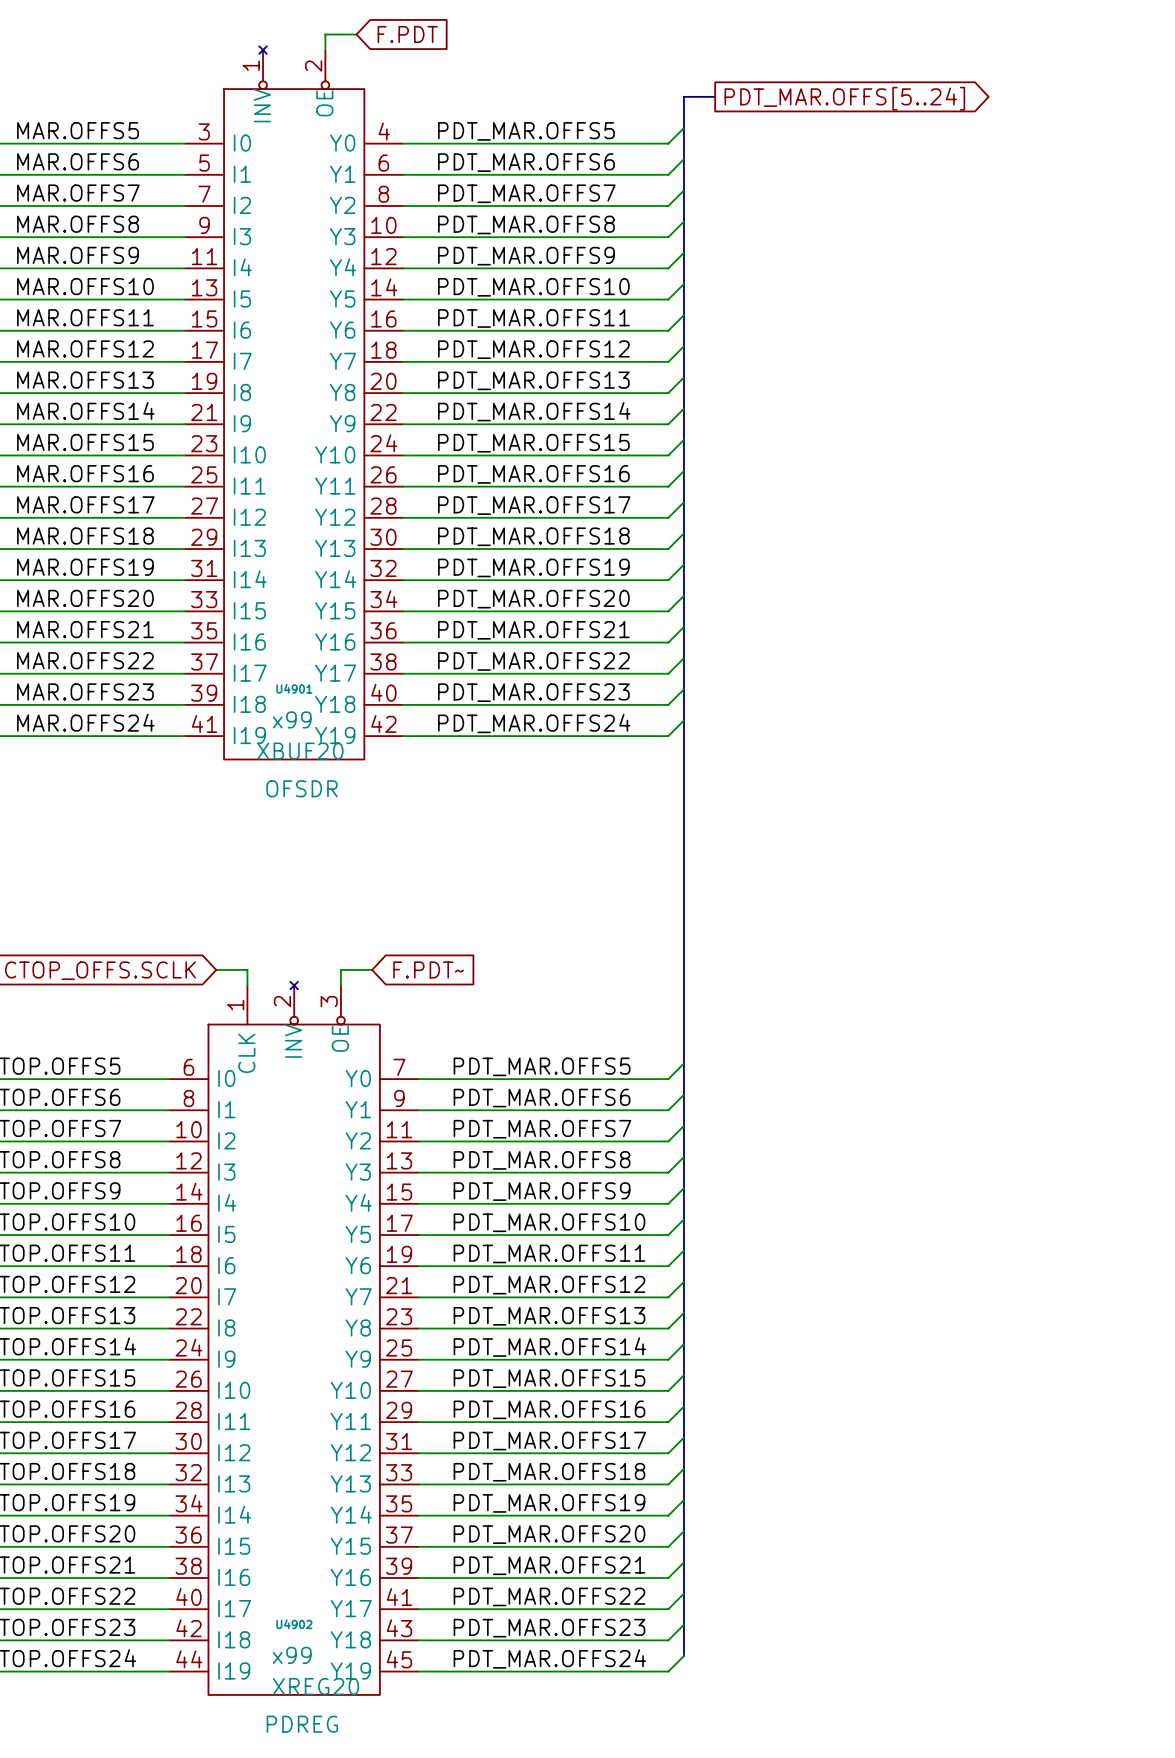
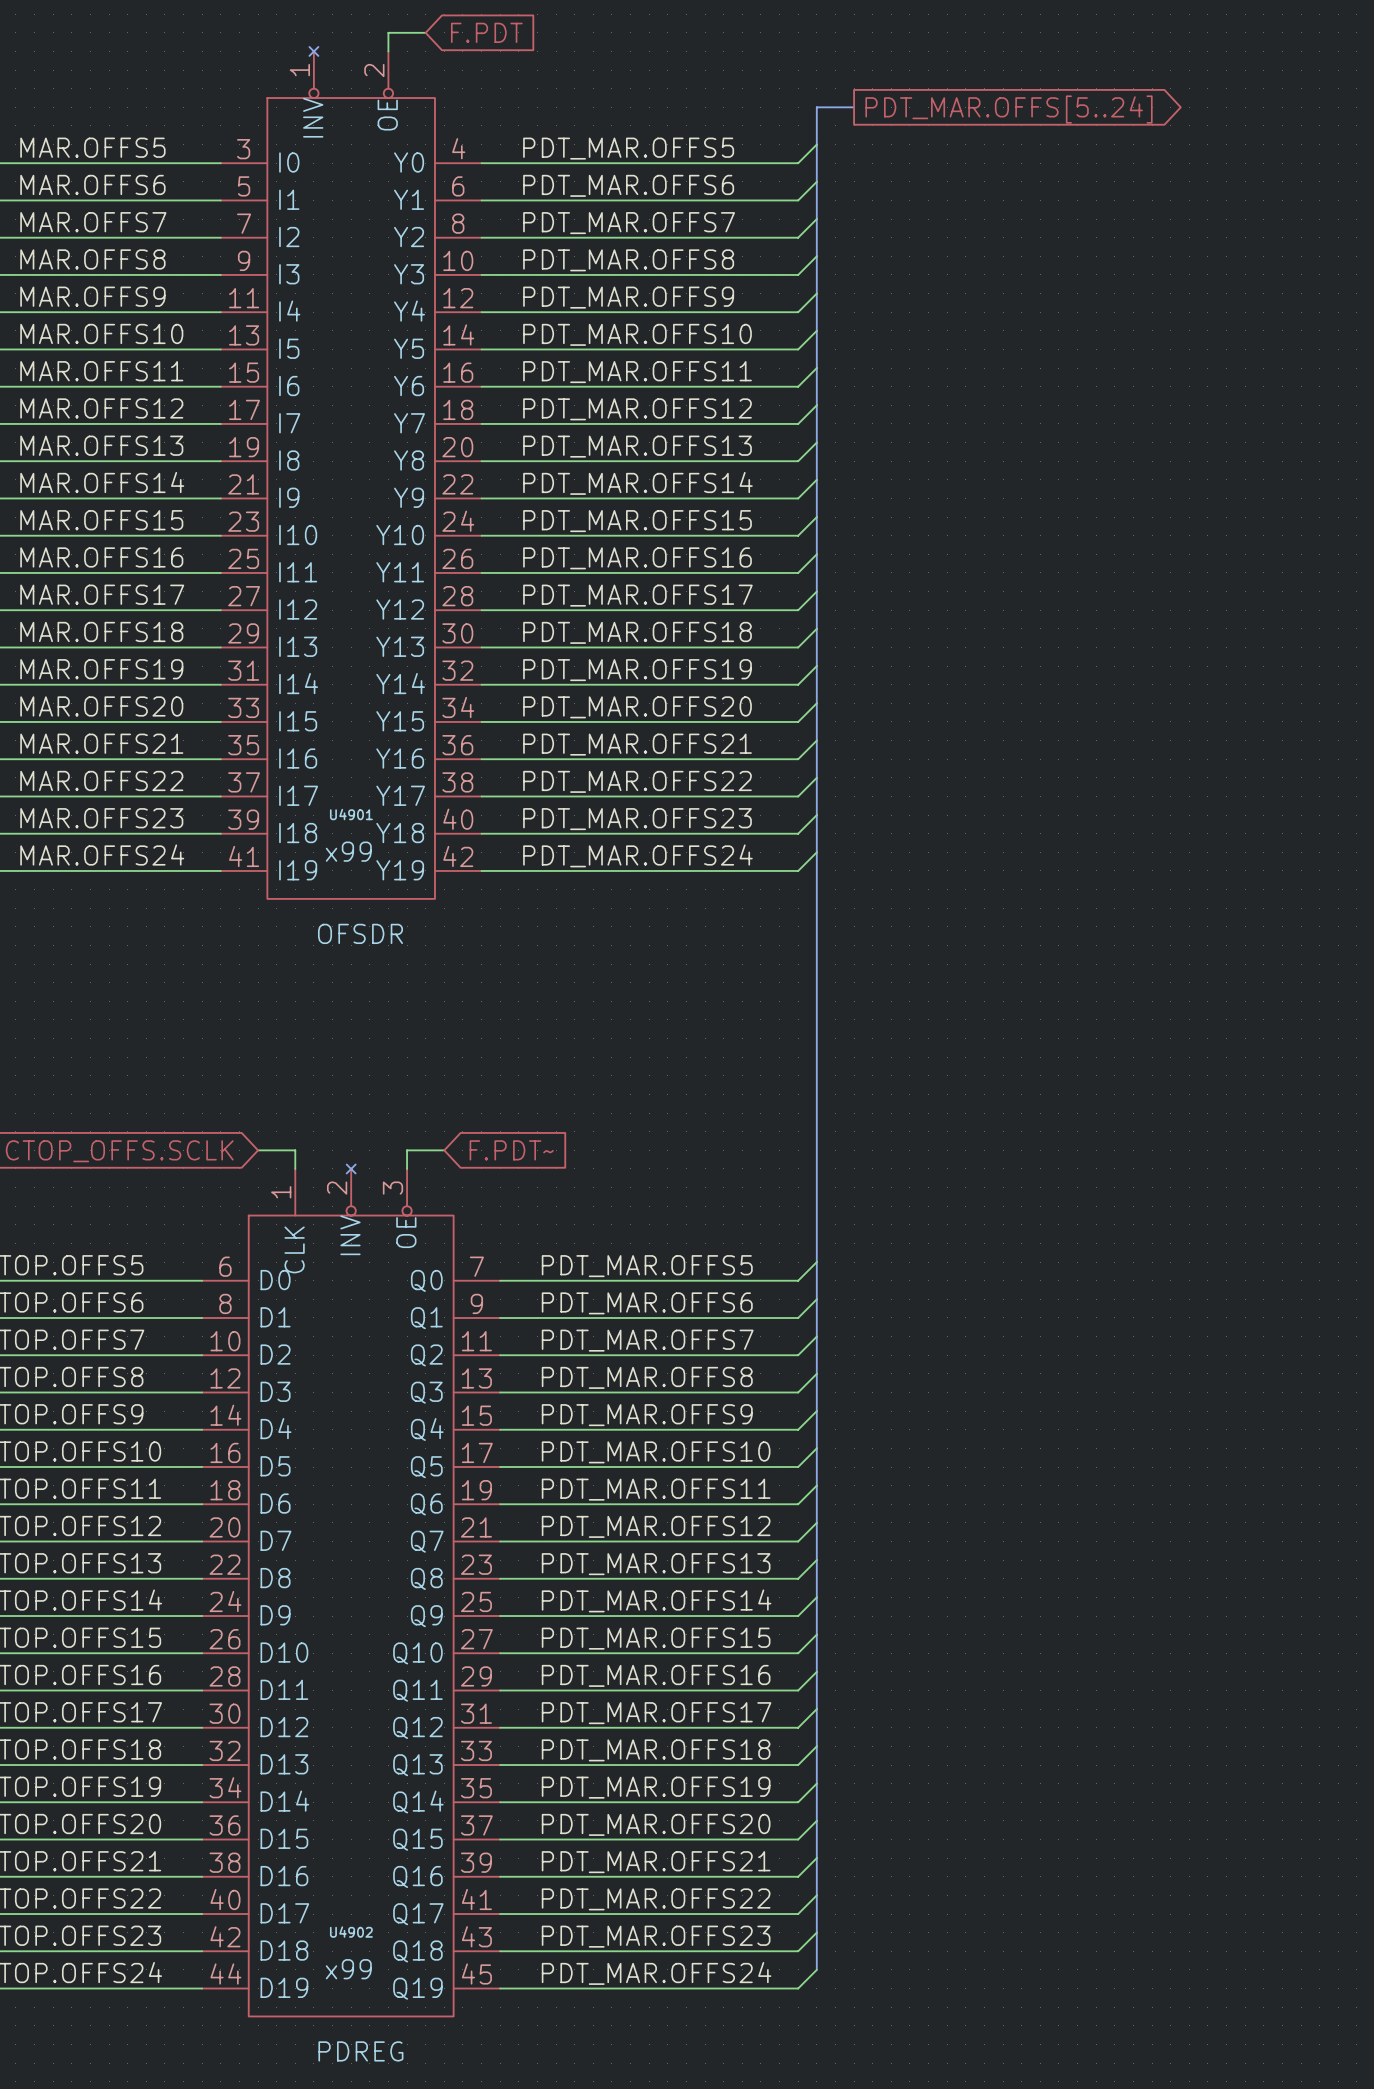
U4901 value: XBUF20 (300, 751) -> none
U4902 symbol: [169, 985, 419, 1695] -> [202, 1168, 501, 2017]
U4902 value: XREG20 (315, 1686) -> none

